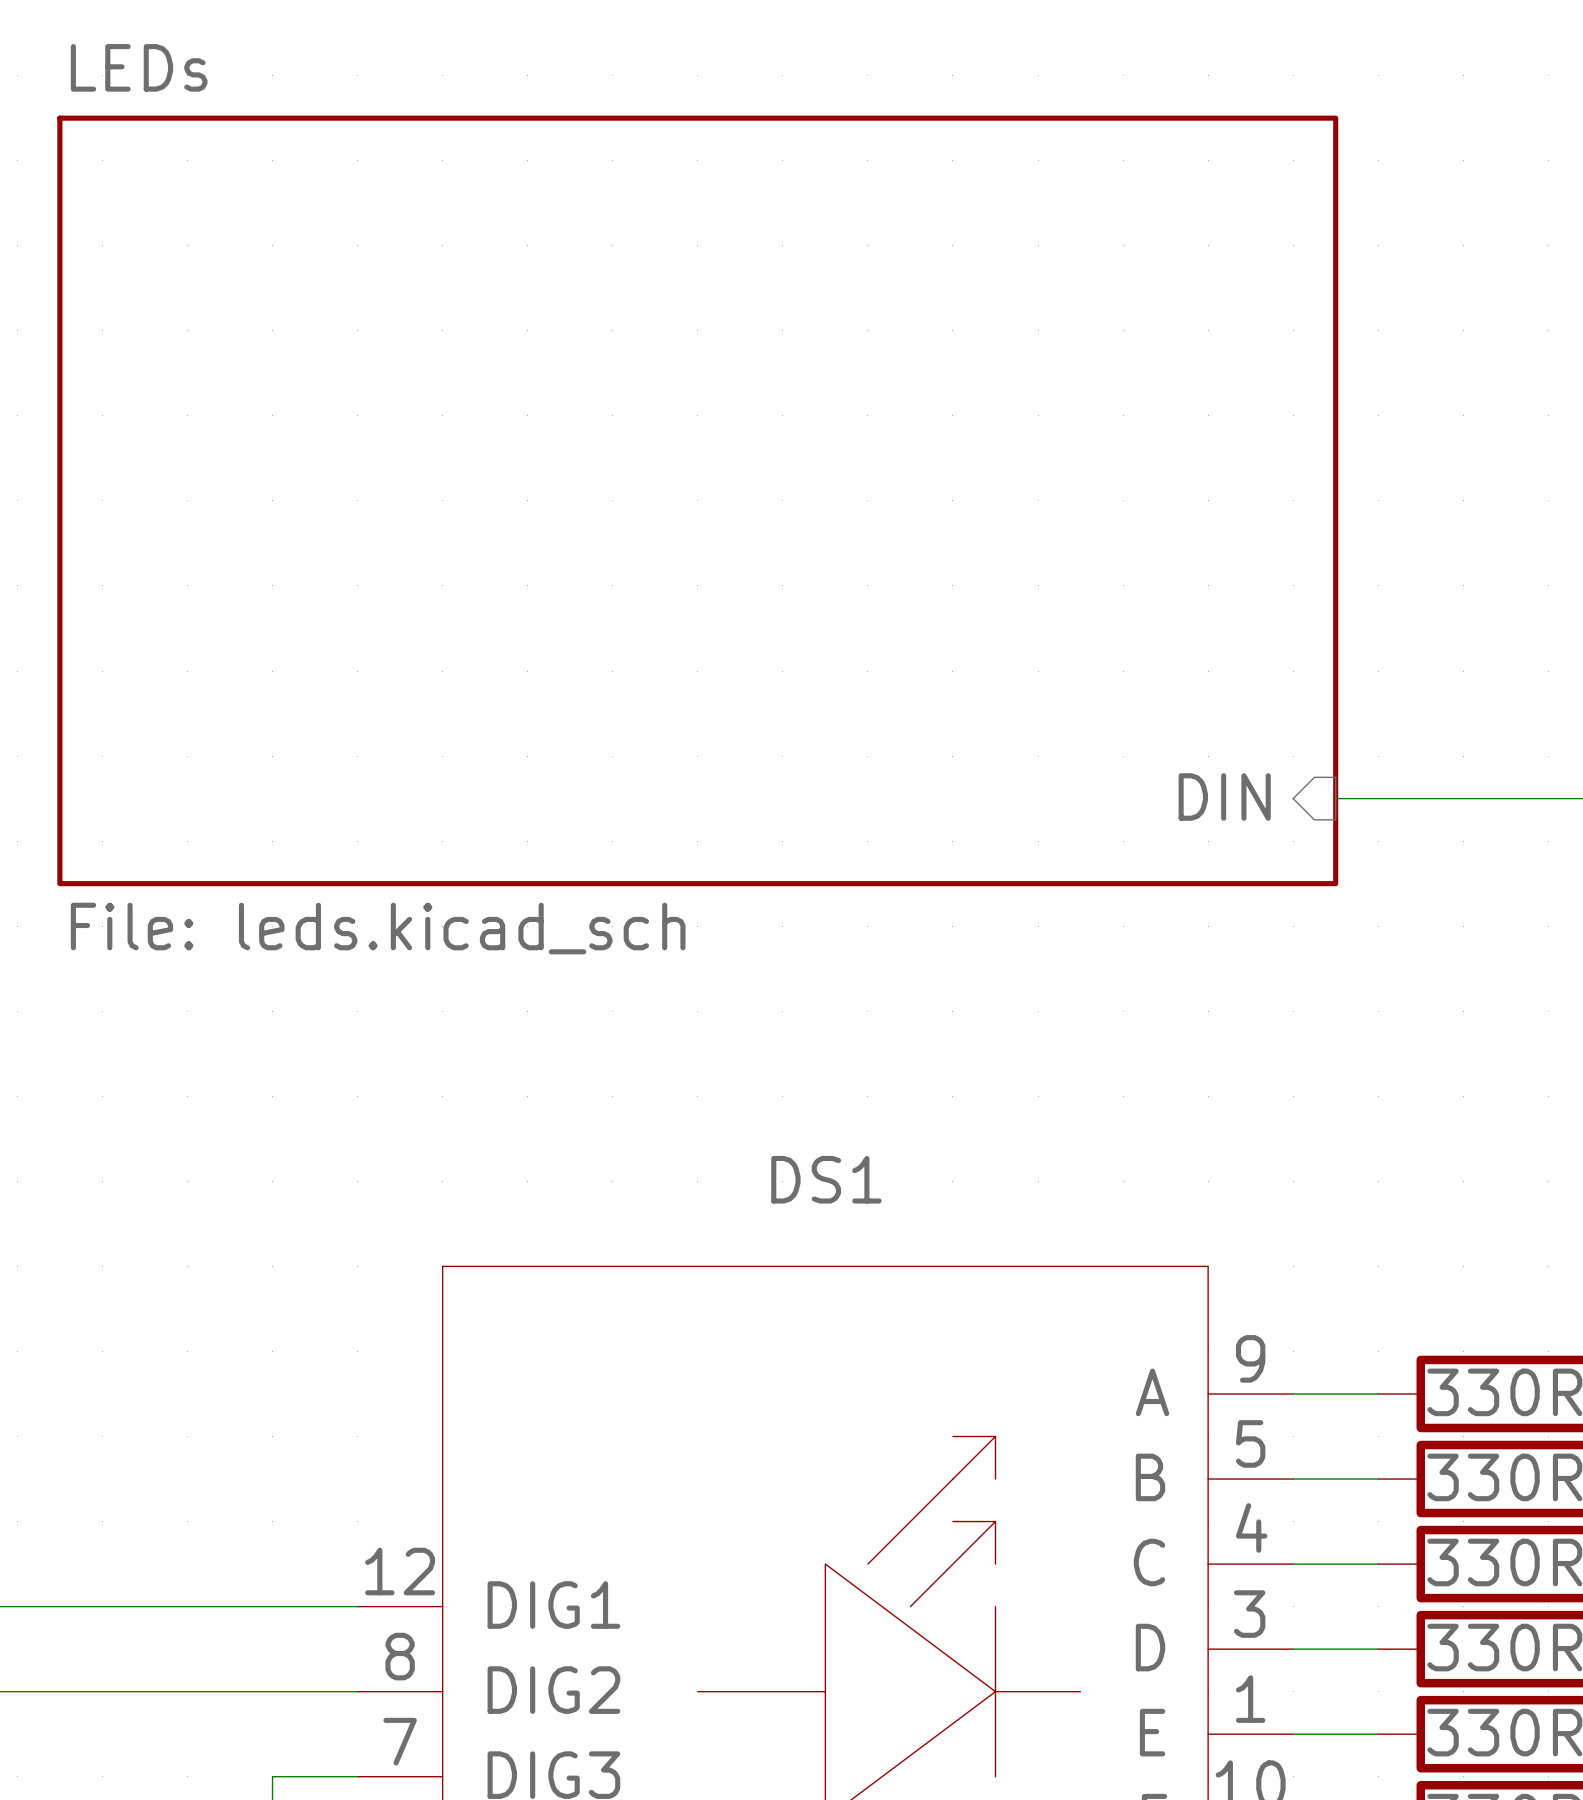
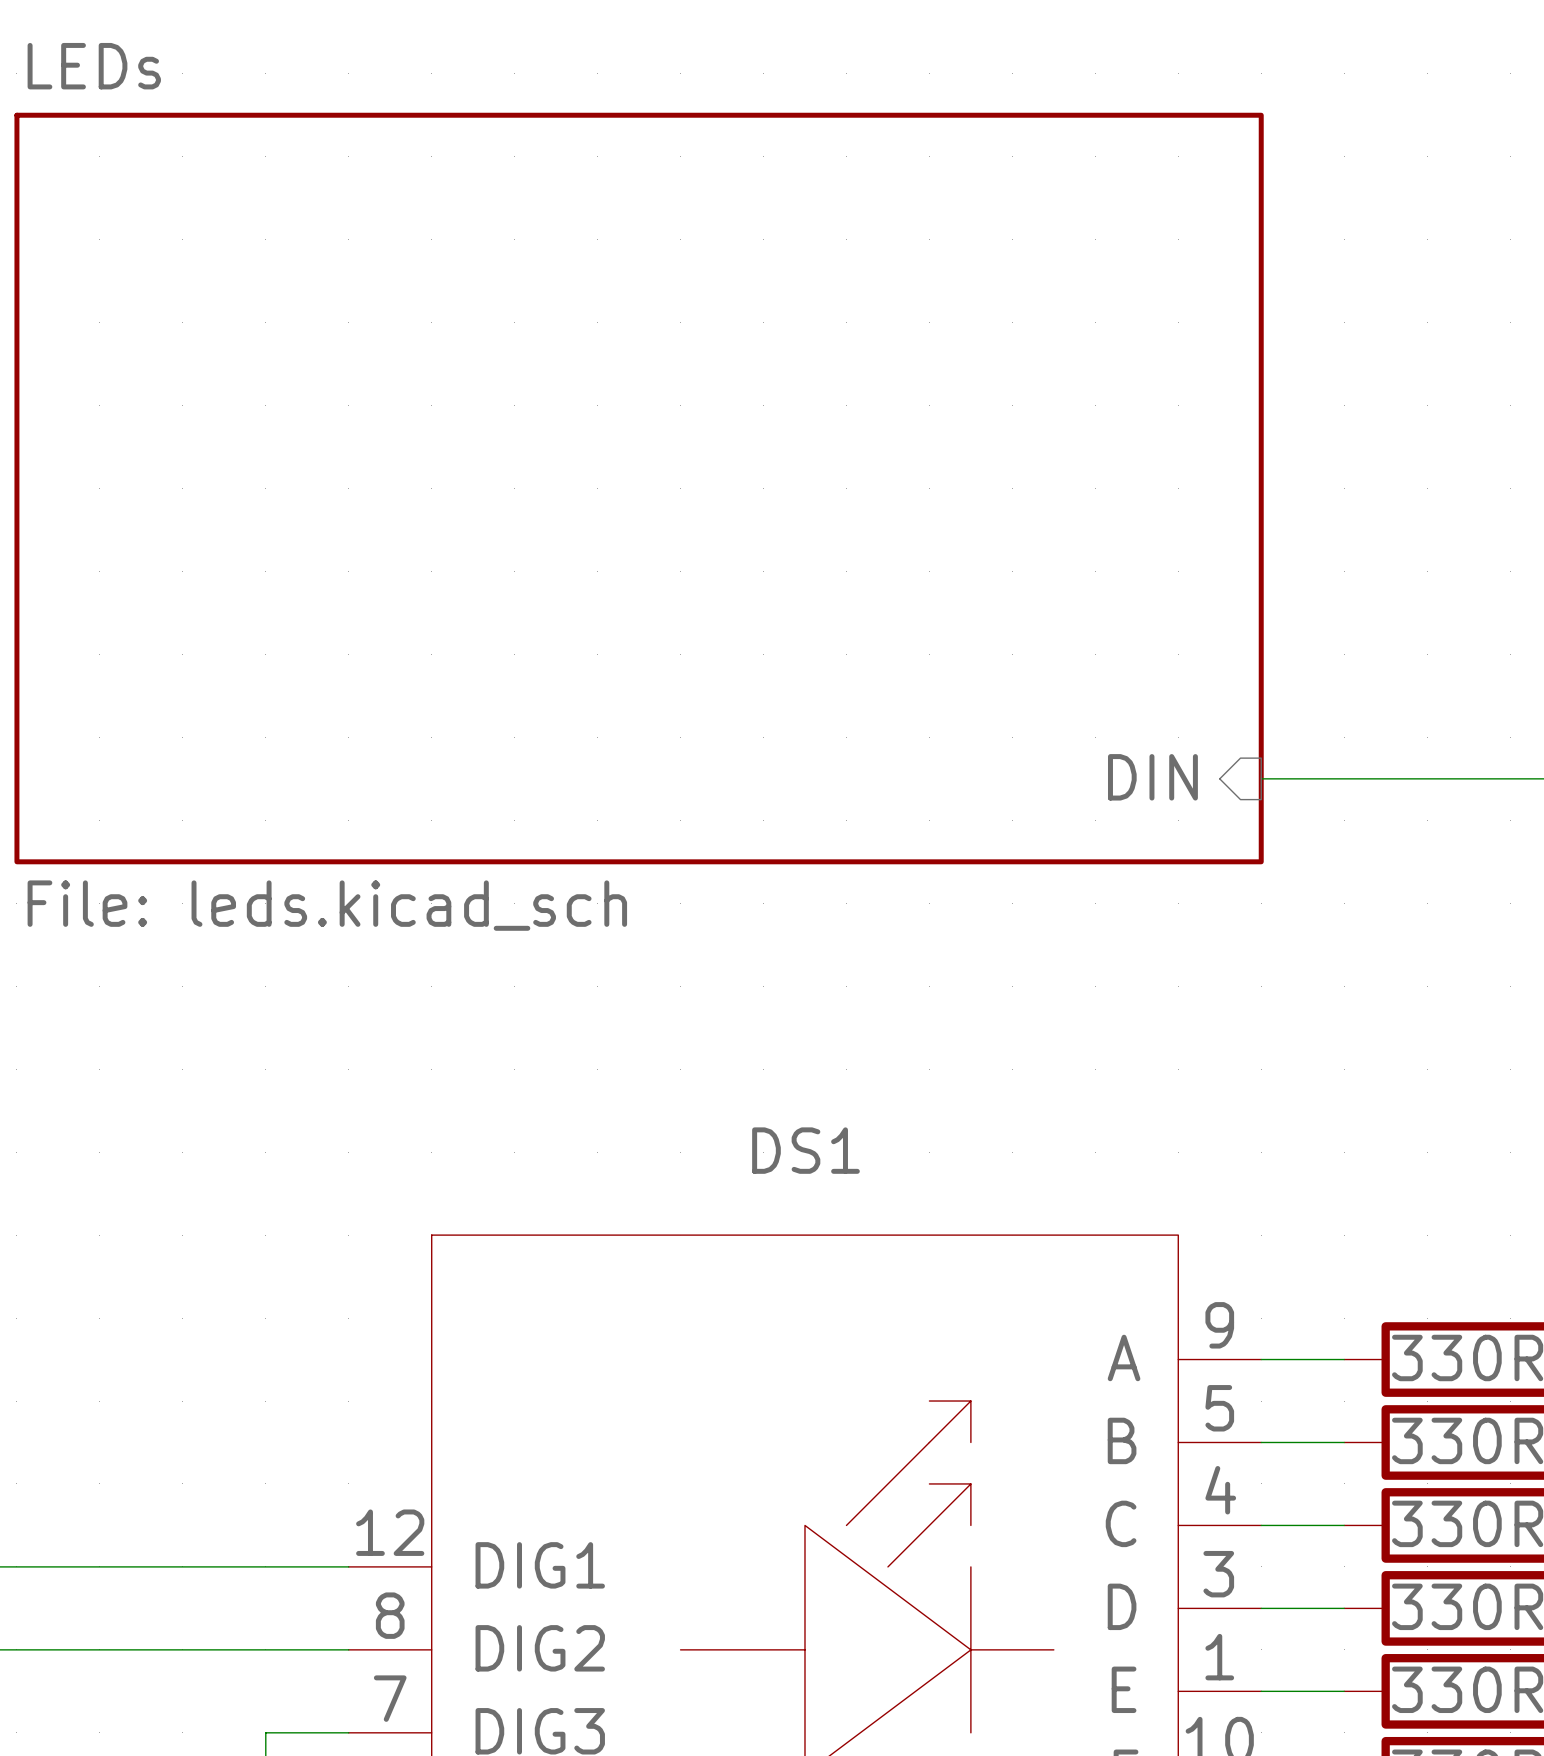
sheet LEDs position: (697, 500) -> (639, 488)
sheet pin position: DIN (1224, 797) -> DIN (1152, 777)
wire: none -> (1261, 778) (1302, 778)

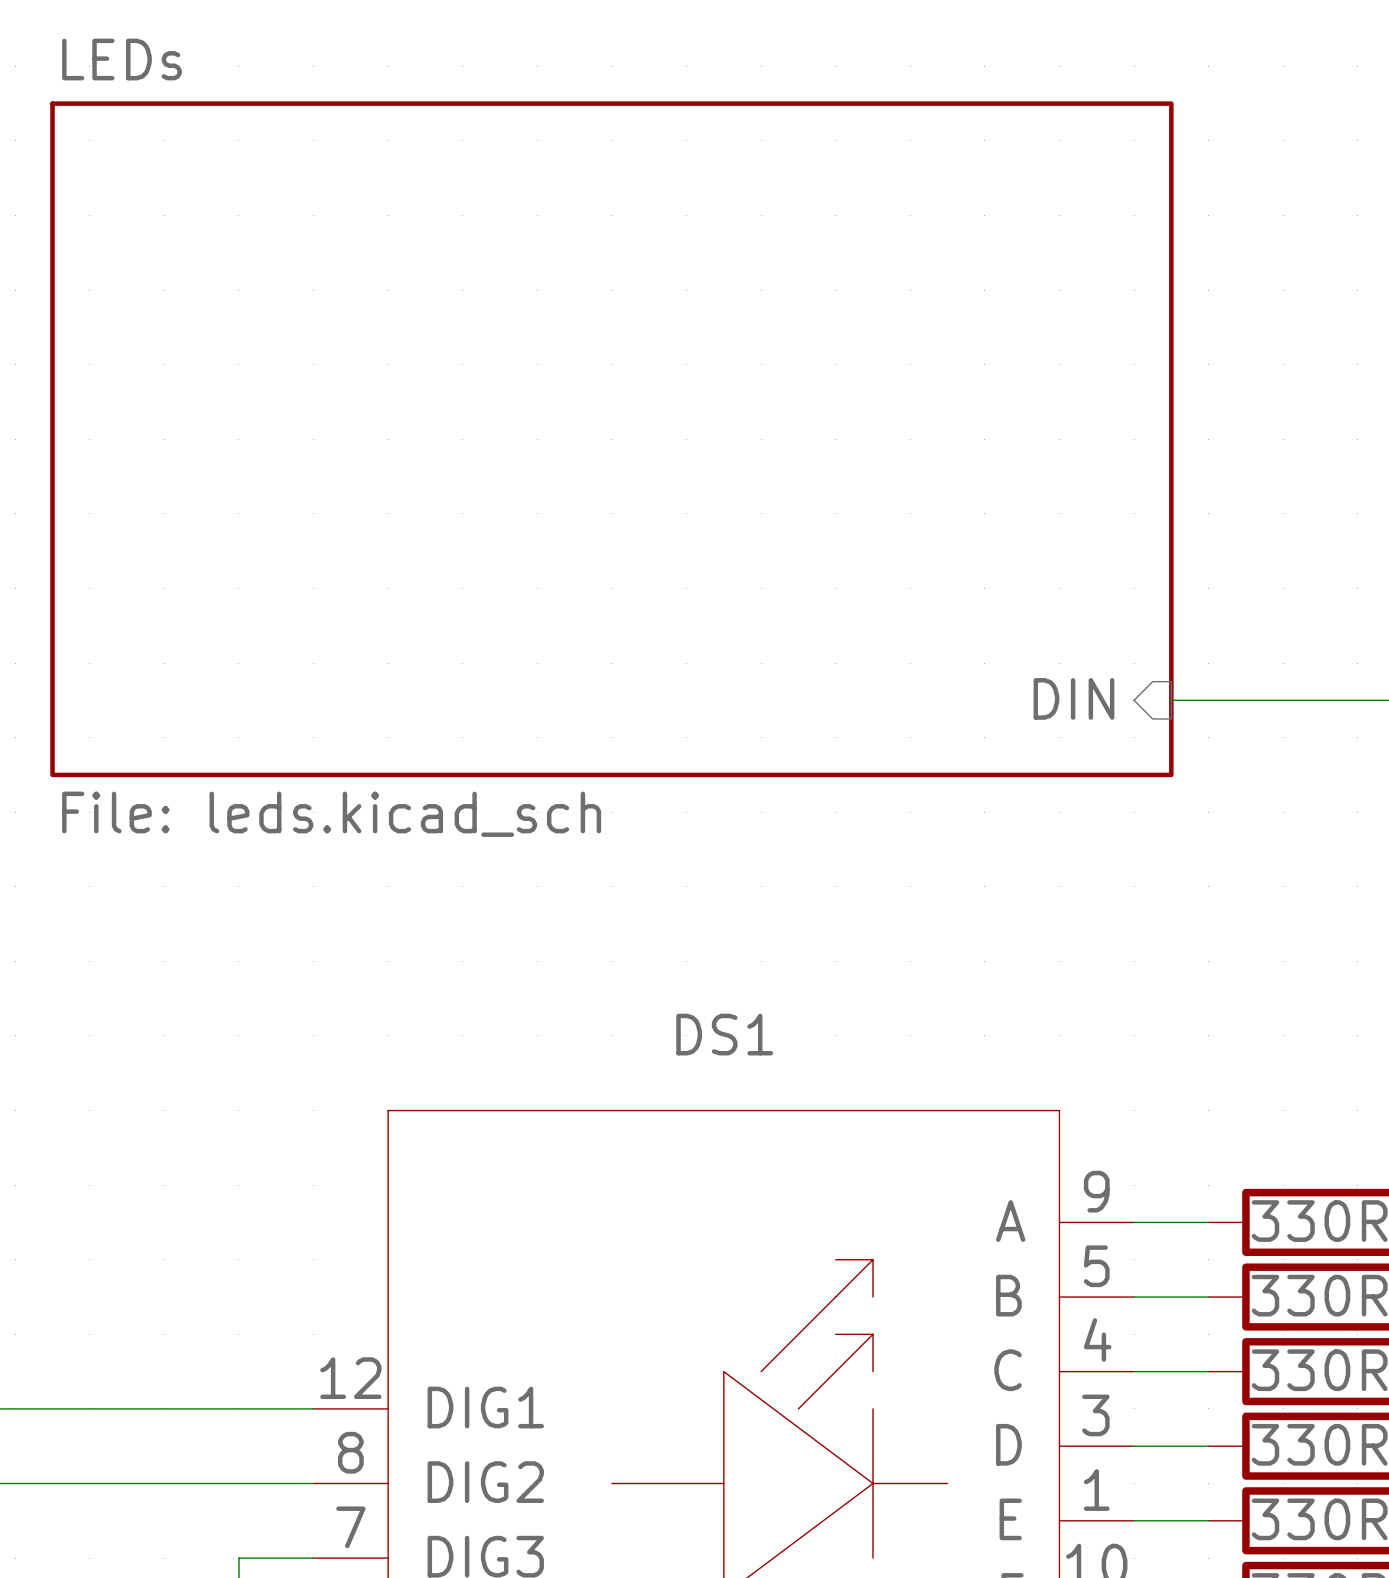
sheet LEDs position: (639, 488) -> (611, 439)
sheet pin position: DIN (1152, 777) -> DIN (1073, 698)
wire: (1261, 778) (1302, 778) -> none

